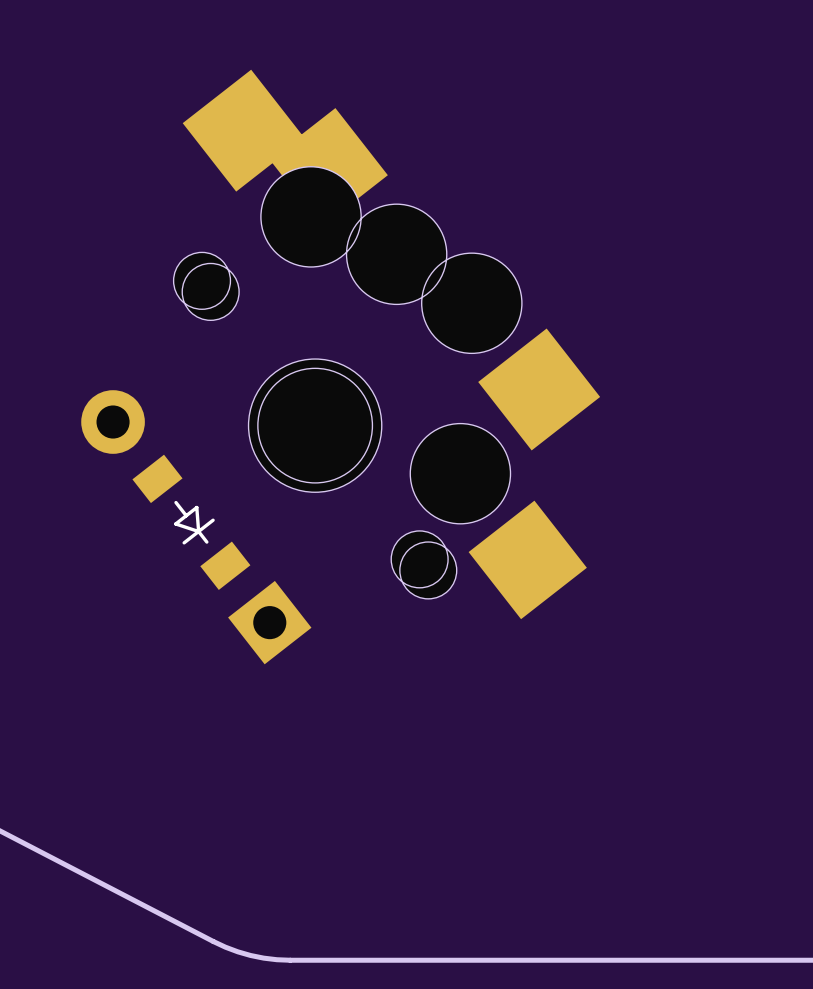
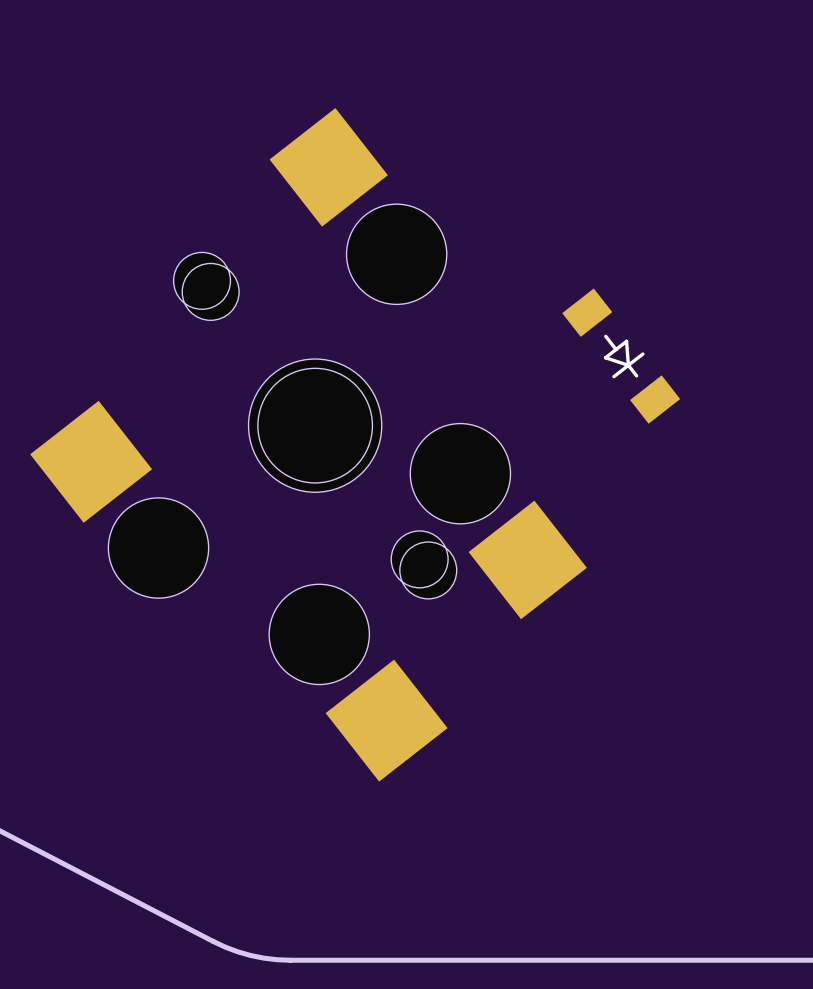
part rotation: 0° (386, 334) -> 180° (243, 517)
part: none -> (621, 356)
part: (196, 527) -> none

